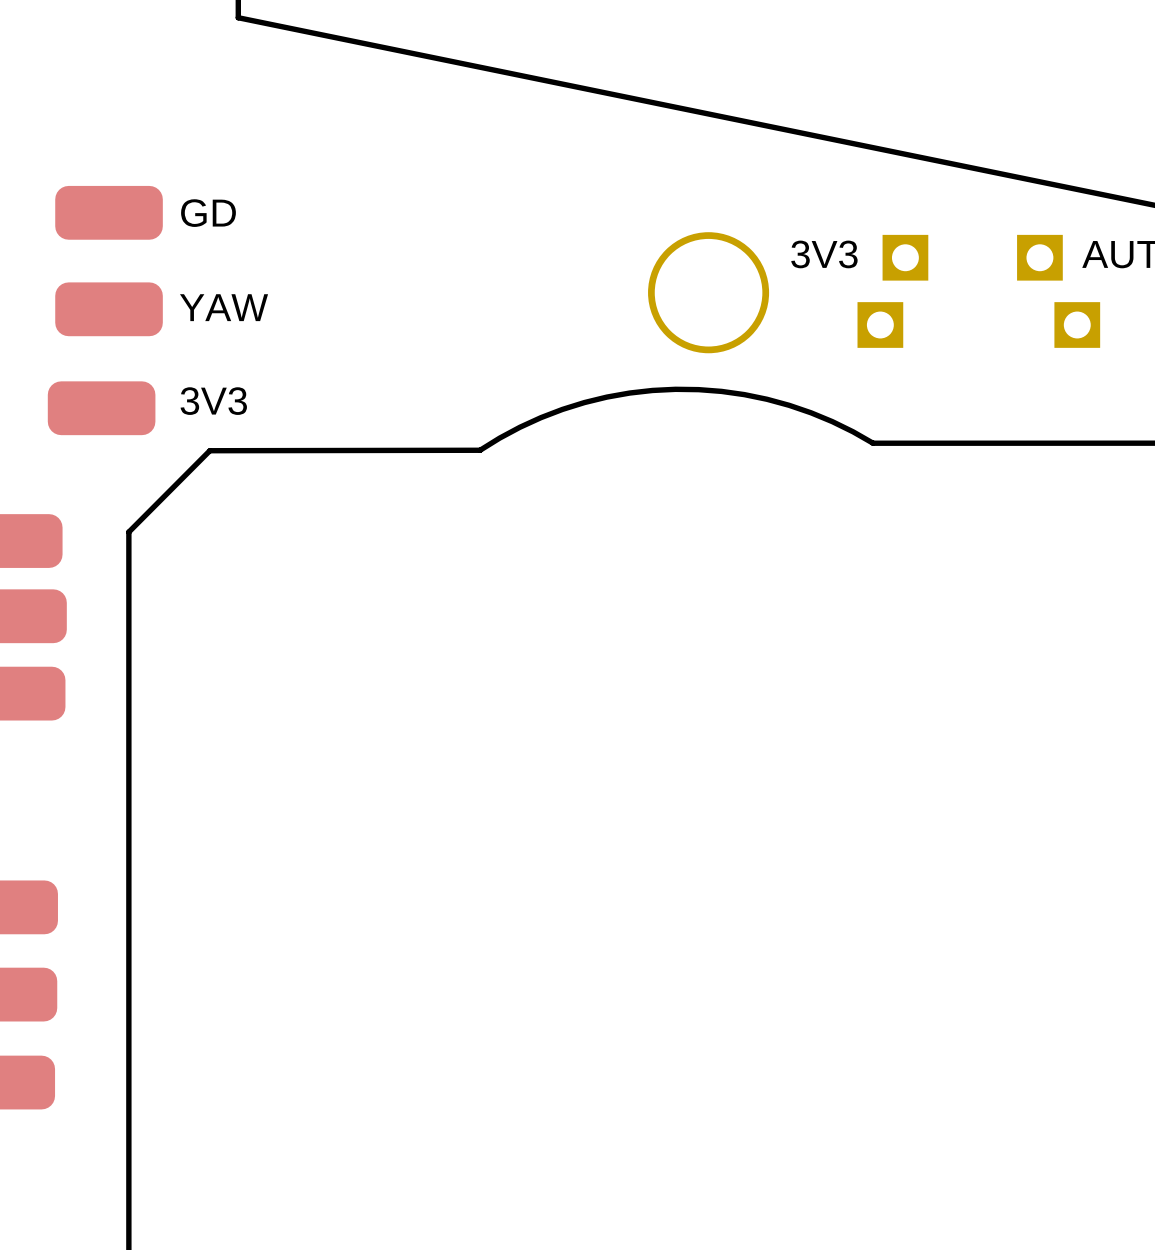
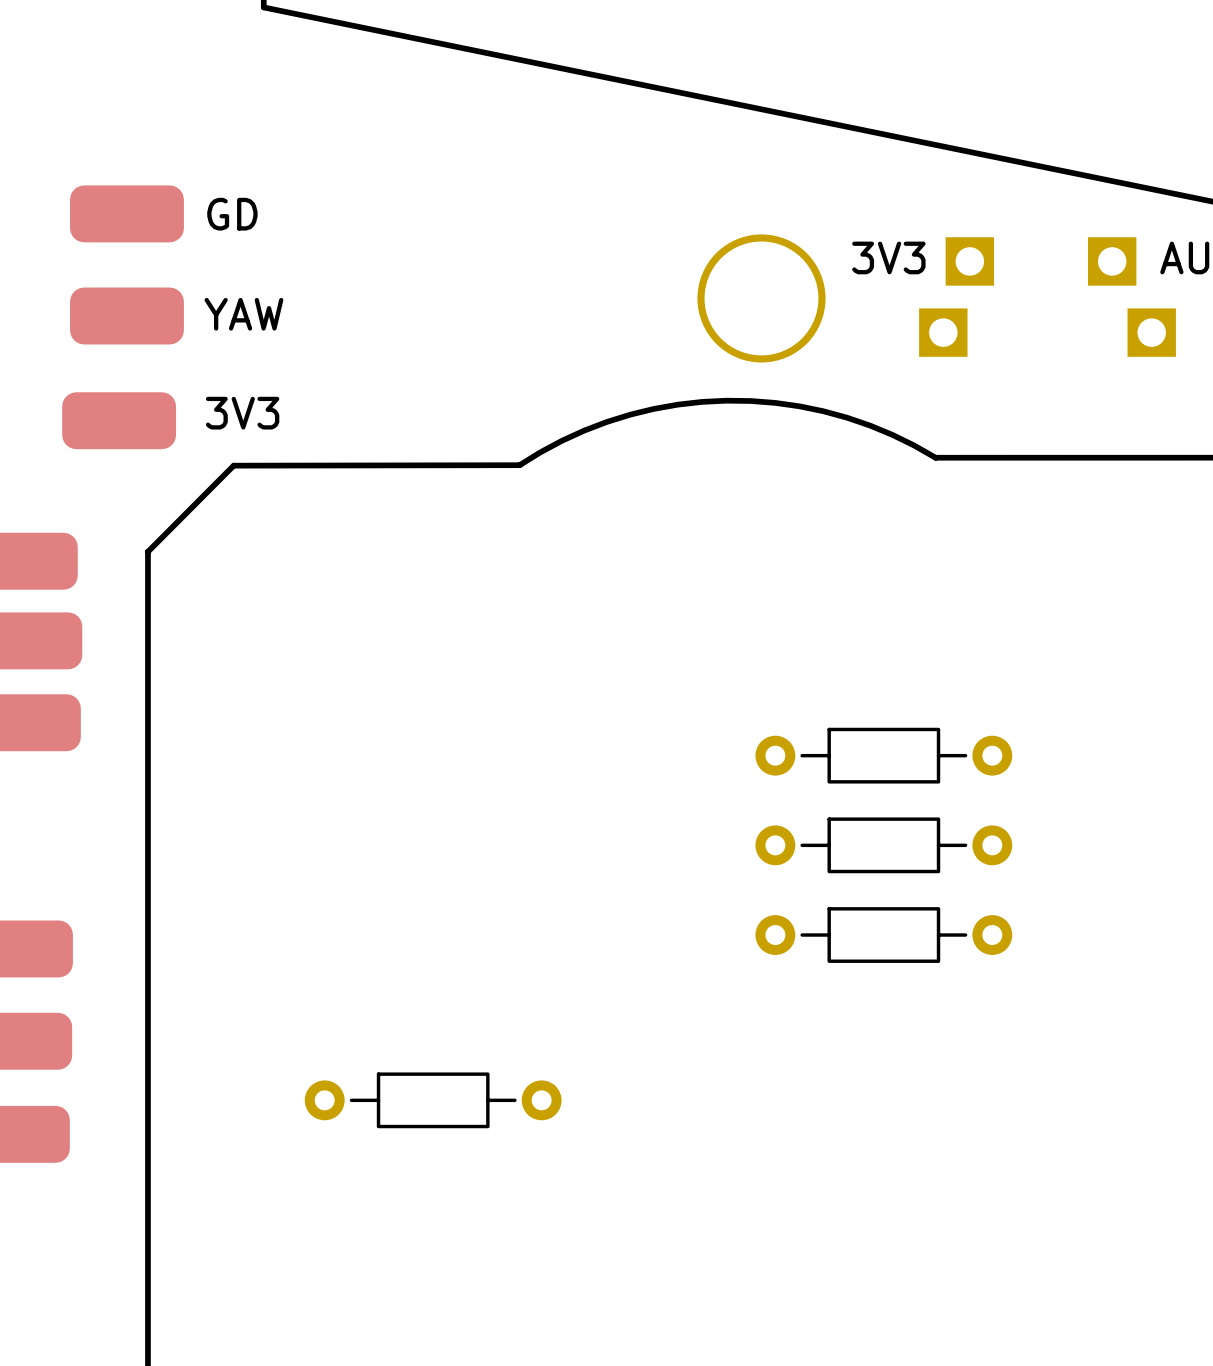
part: none -> (883, 755)
part: none -> (883, 845)
part: none -> (883, 935)
part: none -> (433, 1100)

